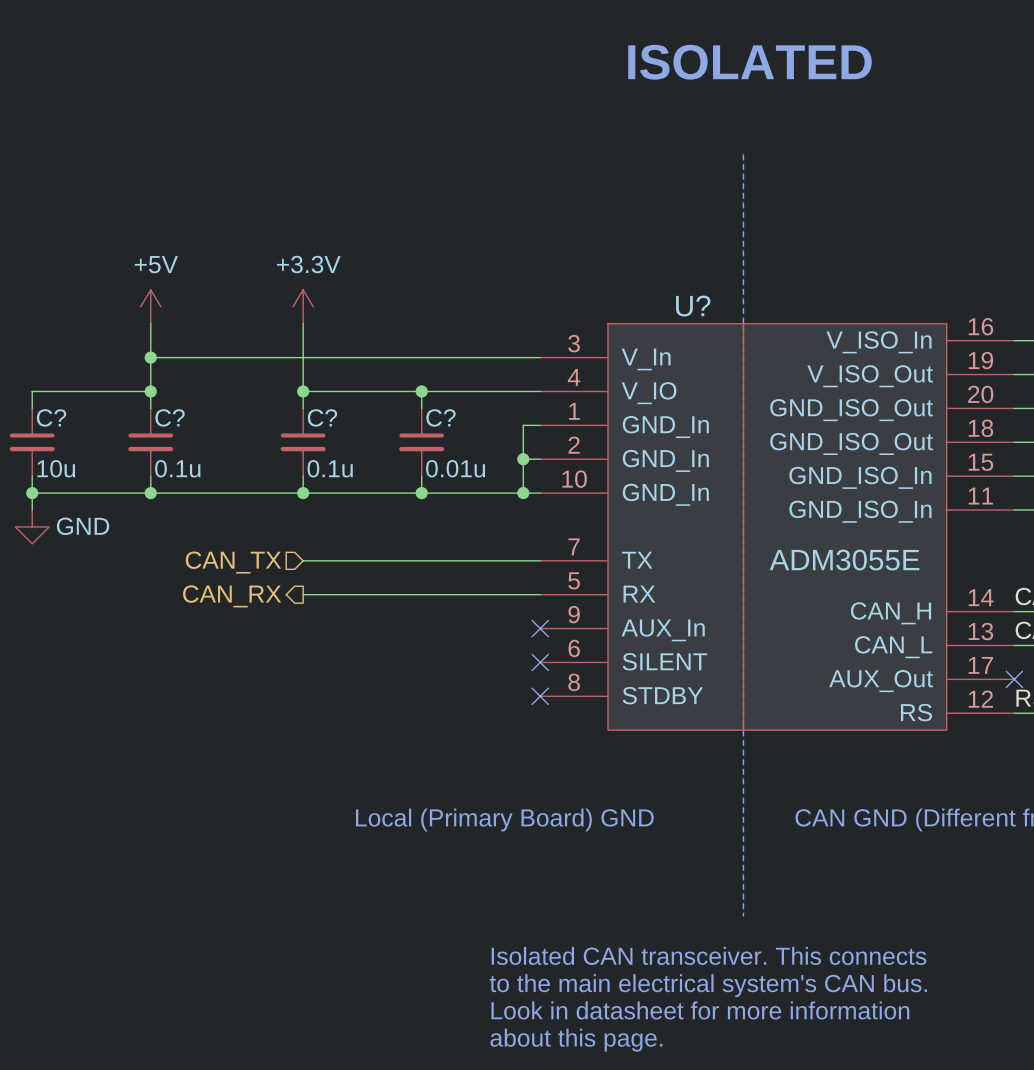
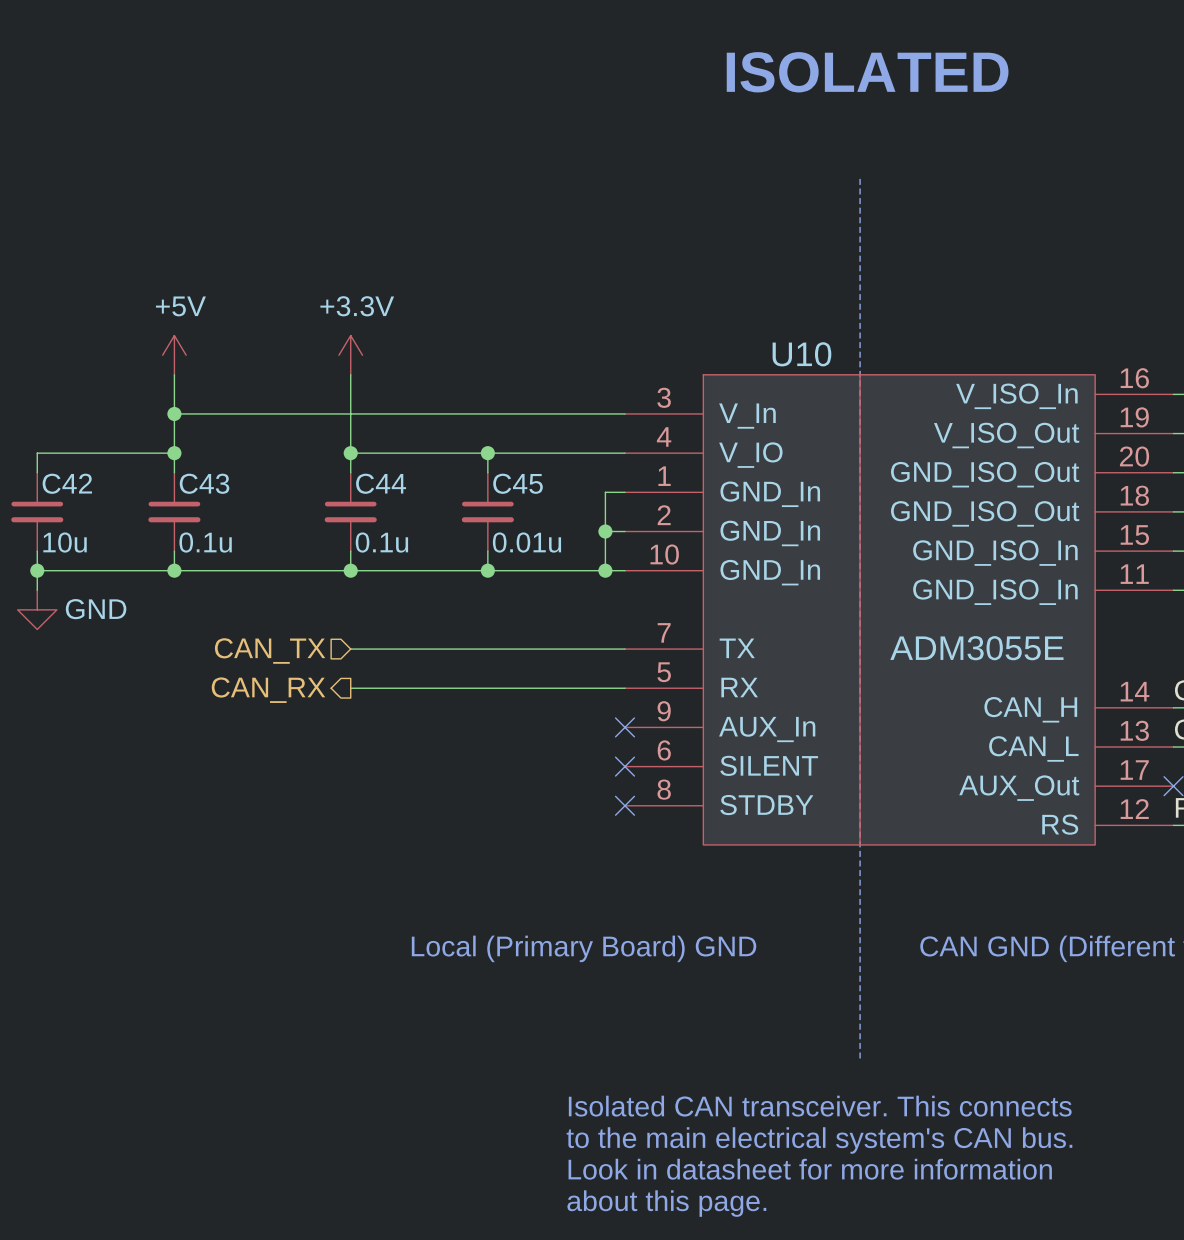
U? name: U? (693, 306) -> U10 (801, 354)
C? name: C? (51, 417) -> C42 (67, 483)
C? name: C? (170, 417) -> C43 (204, 483)
C? name: C? (322, 417) -> C44 (381, 483)
C? name: C? (440, 417) -> C45 (518, 483)

